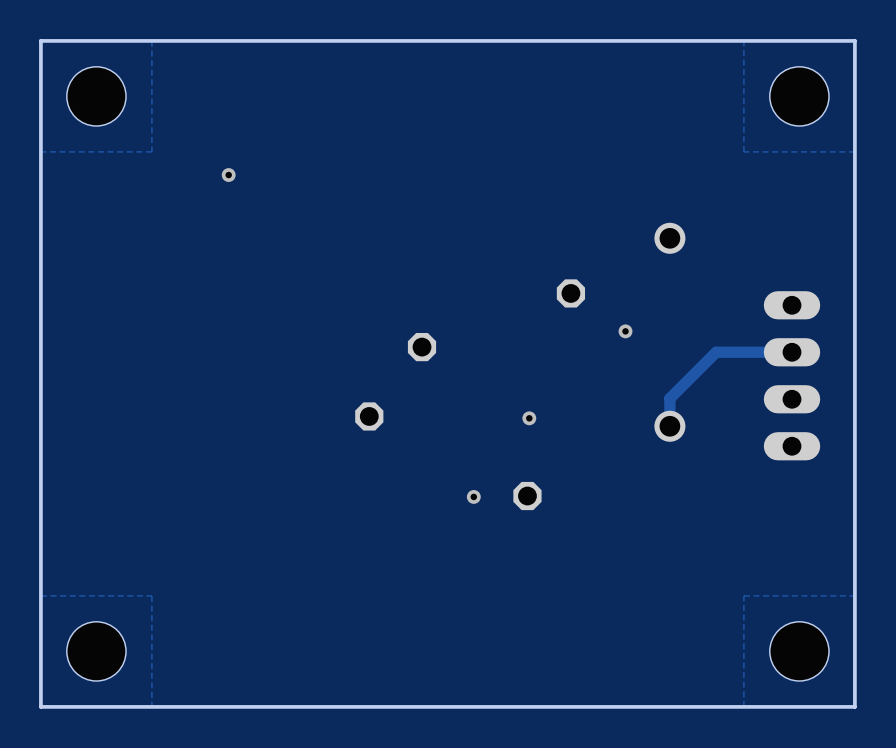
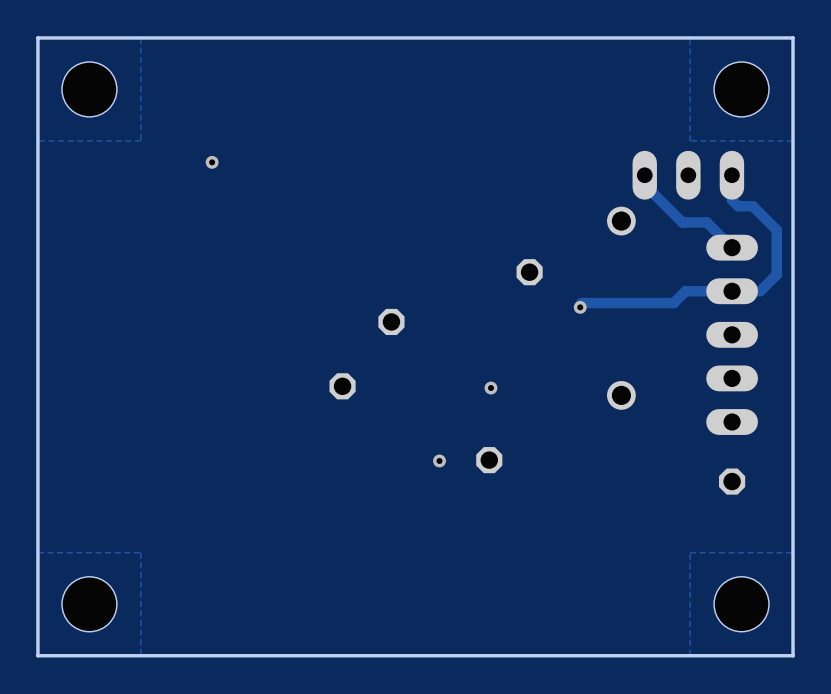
track: none -> (644, 175) (644, 184) (682, 222) (706, 222) (732, 247)
part: none -> (688, 175)
track: none -> (731, 175) (731, 199) (738, 206) (752, 206) (776, 230) (776, 274) (760, 291) (732, 291)
part footprint: [763, 291, 821, 461] -> [706, 234, 758, 435]
track: none -> (732, 291) (685, 291) (673, 303) (581, 303)
track: (792, 352) (716, 352) (669, 398) (669, 426) -> none
part: none -> (732, 481)

